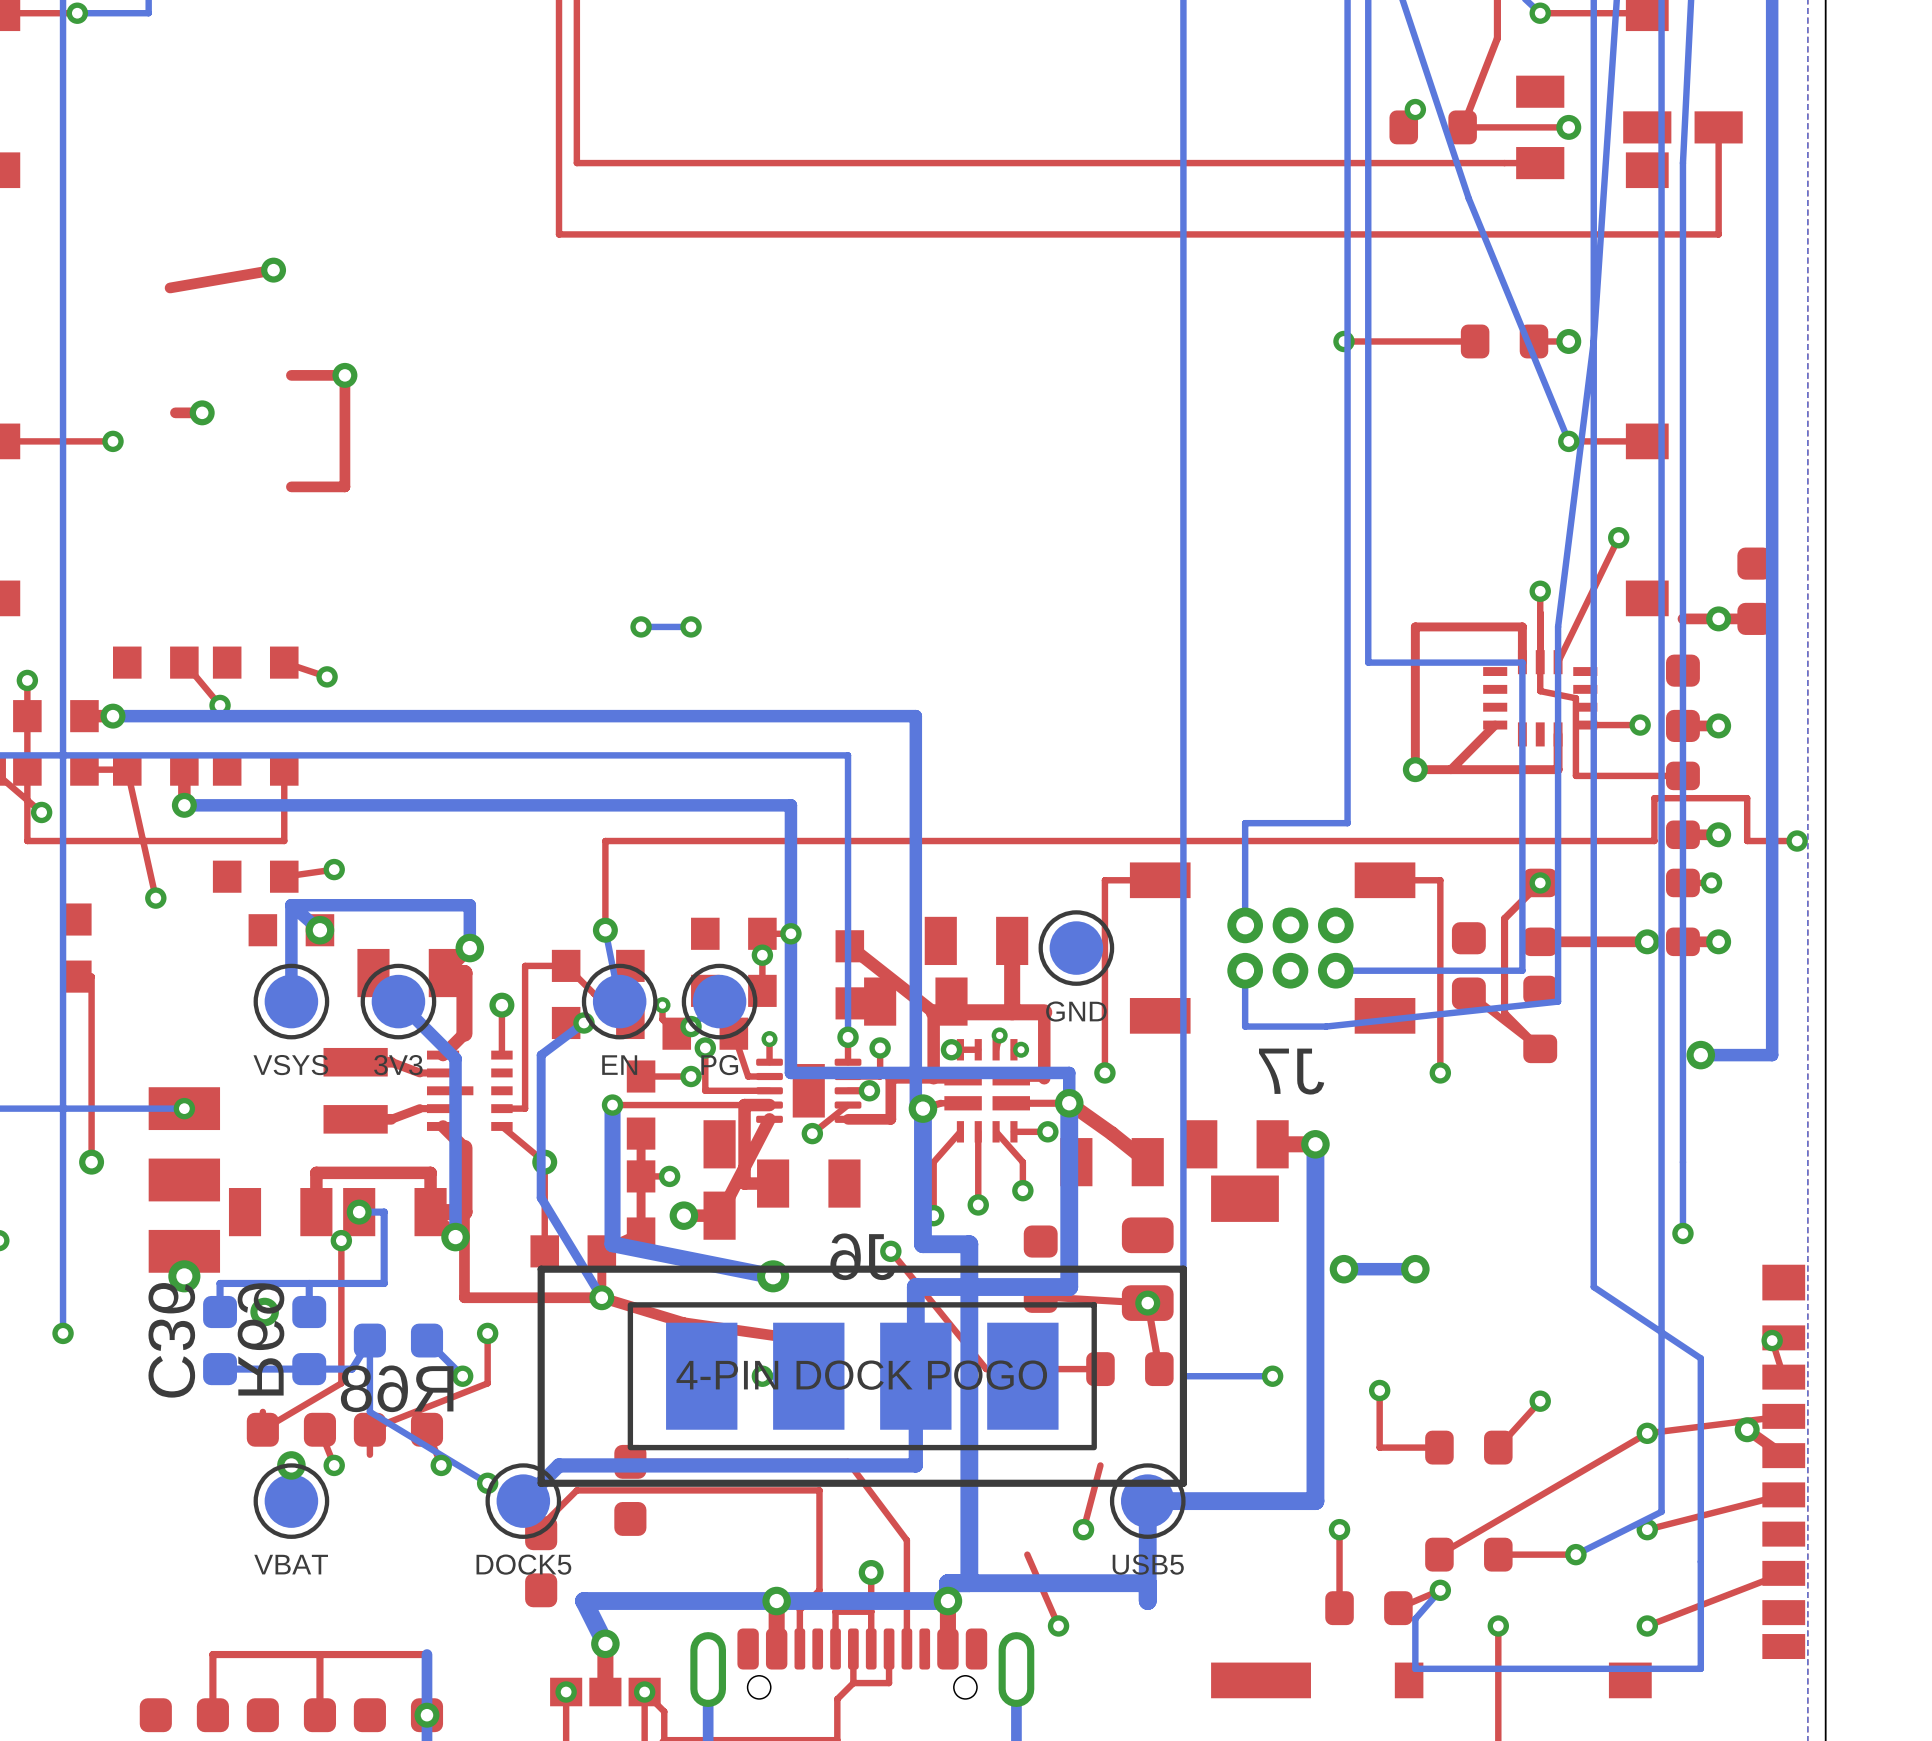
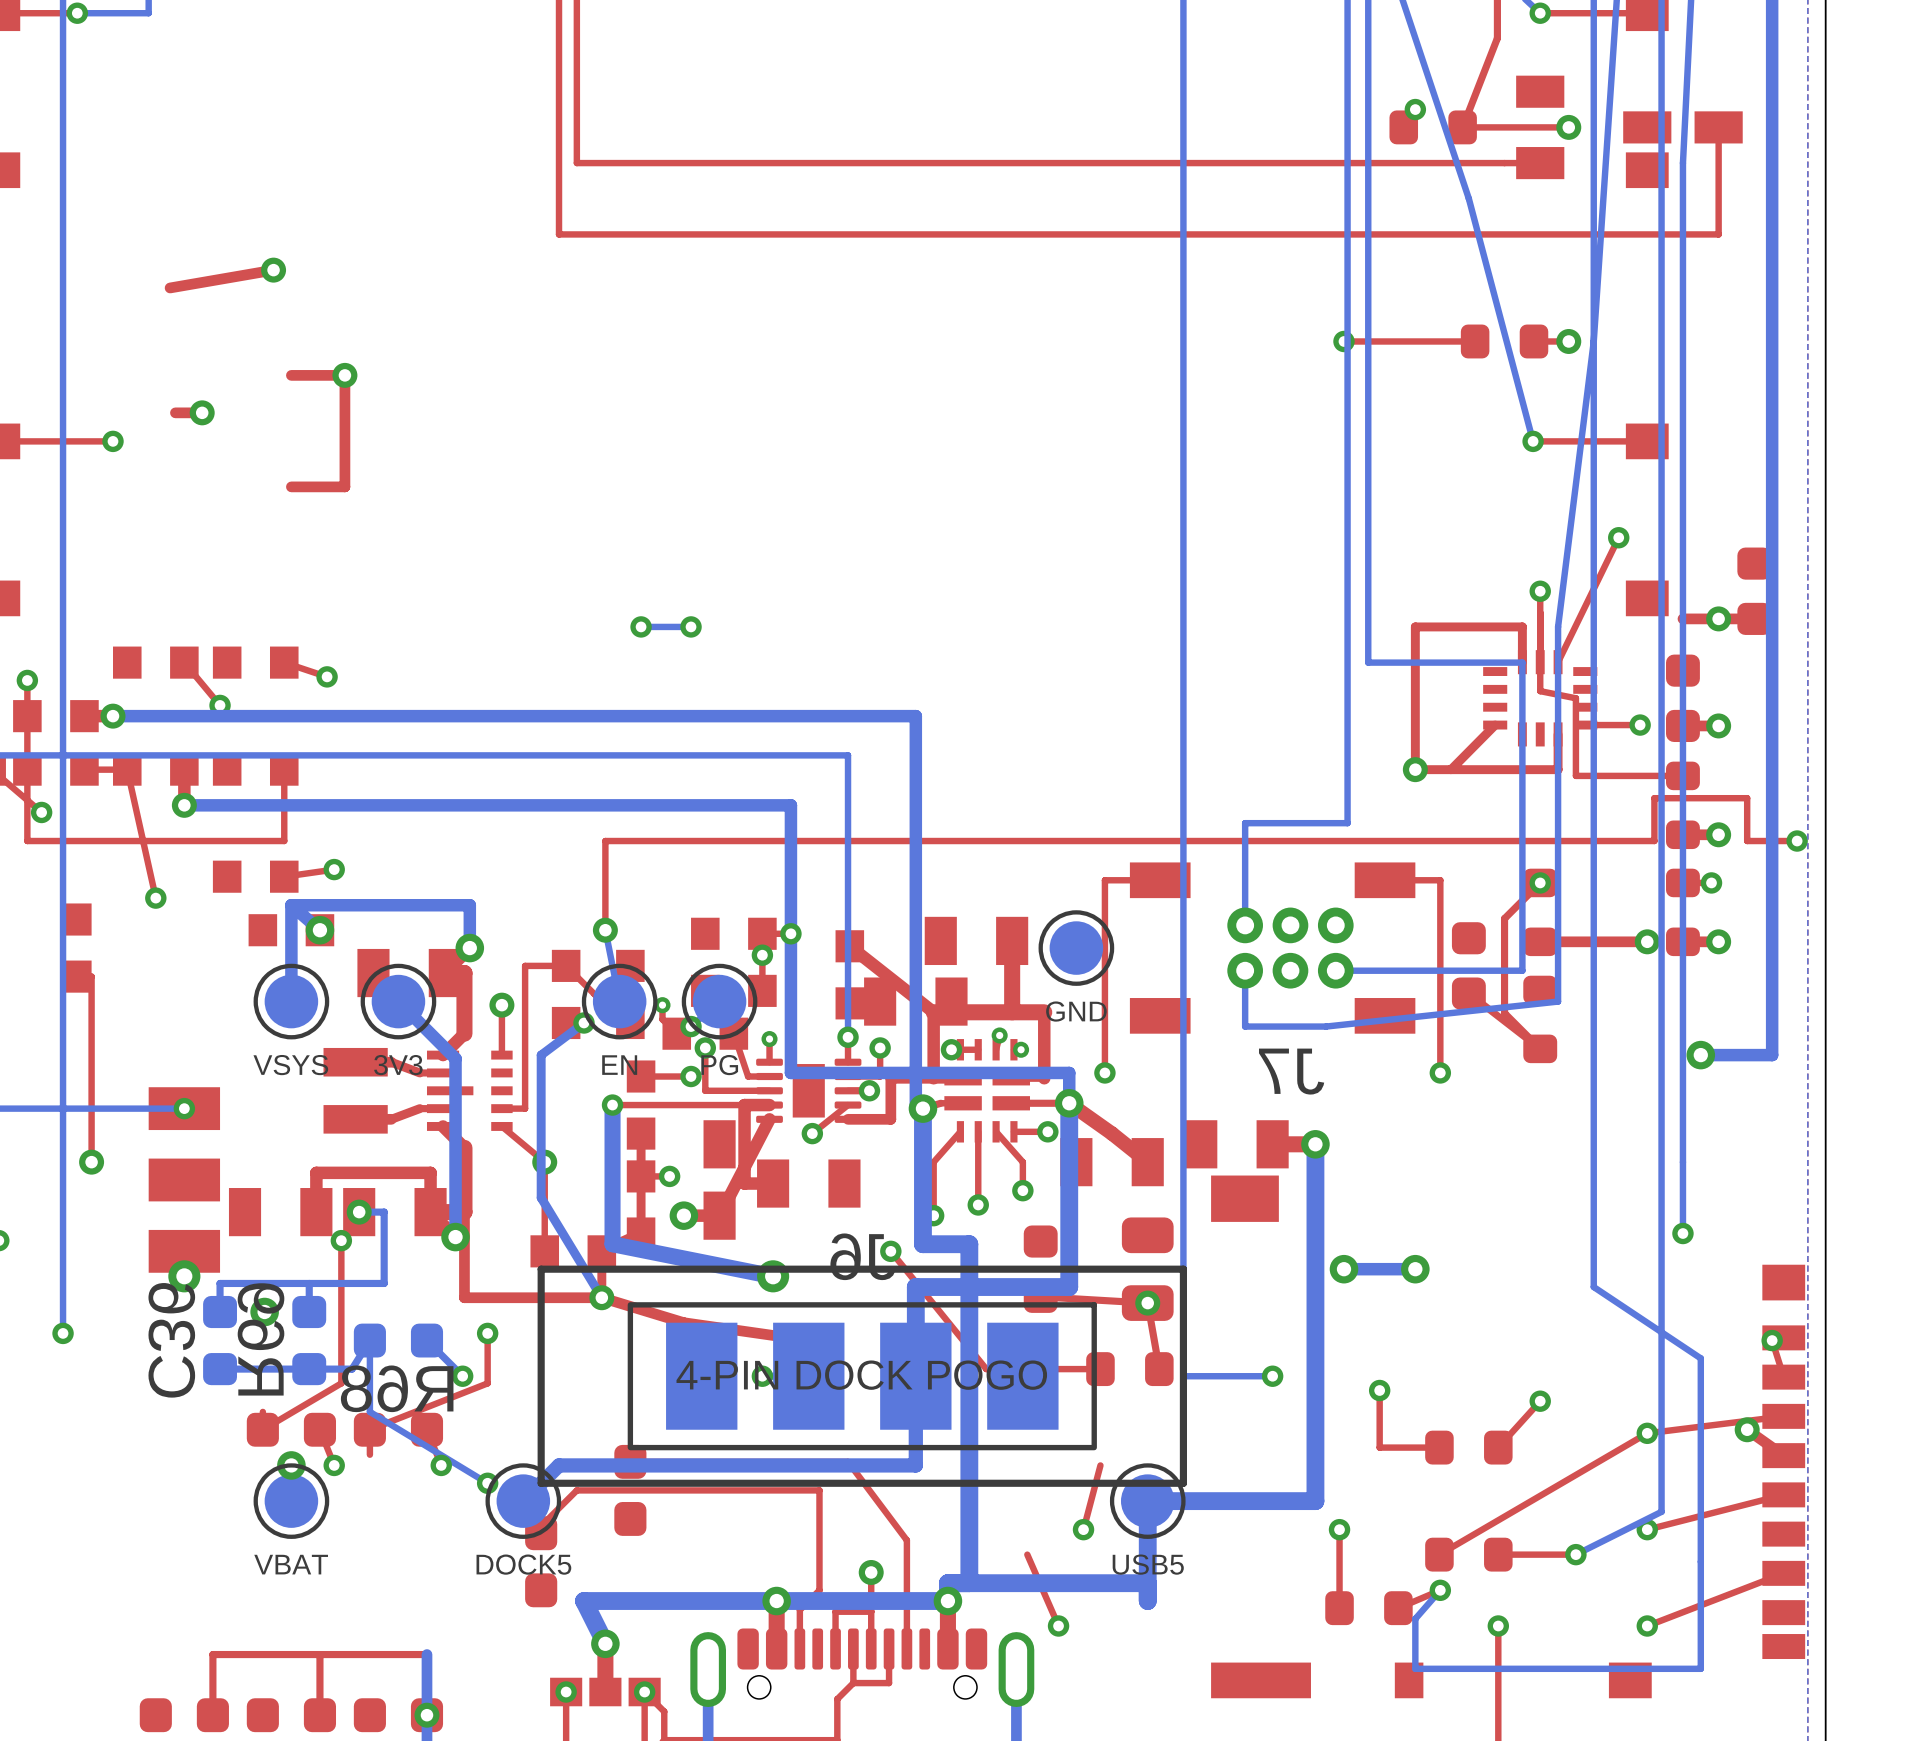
bottom track: (1468, 198) (1568, 441) -> (1468, 198) (1533, 441)
top track: none -> (1568, 441) (1533, 441)
via position: (1568, 441) -> (1533, 441)

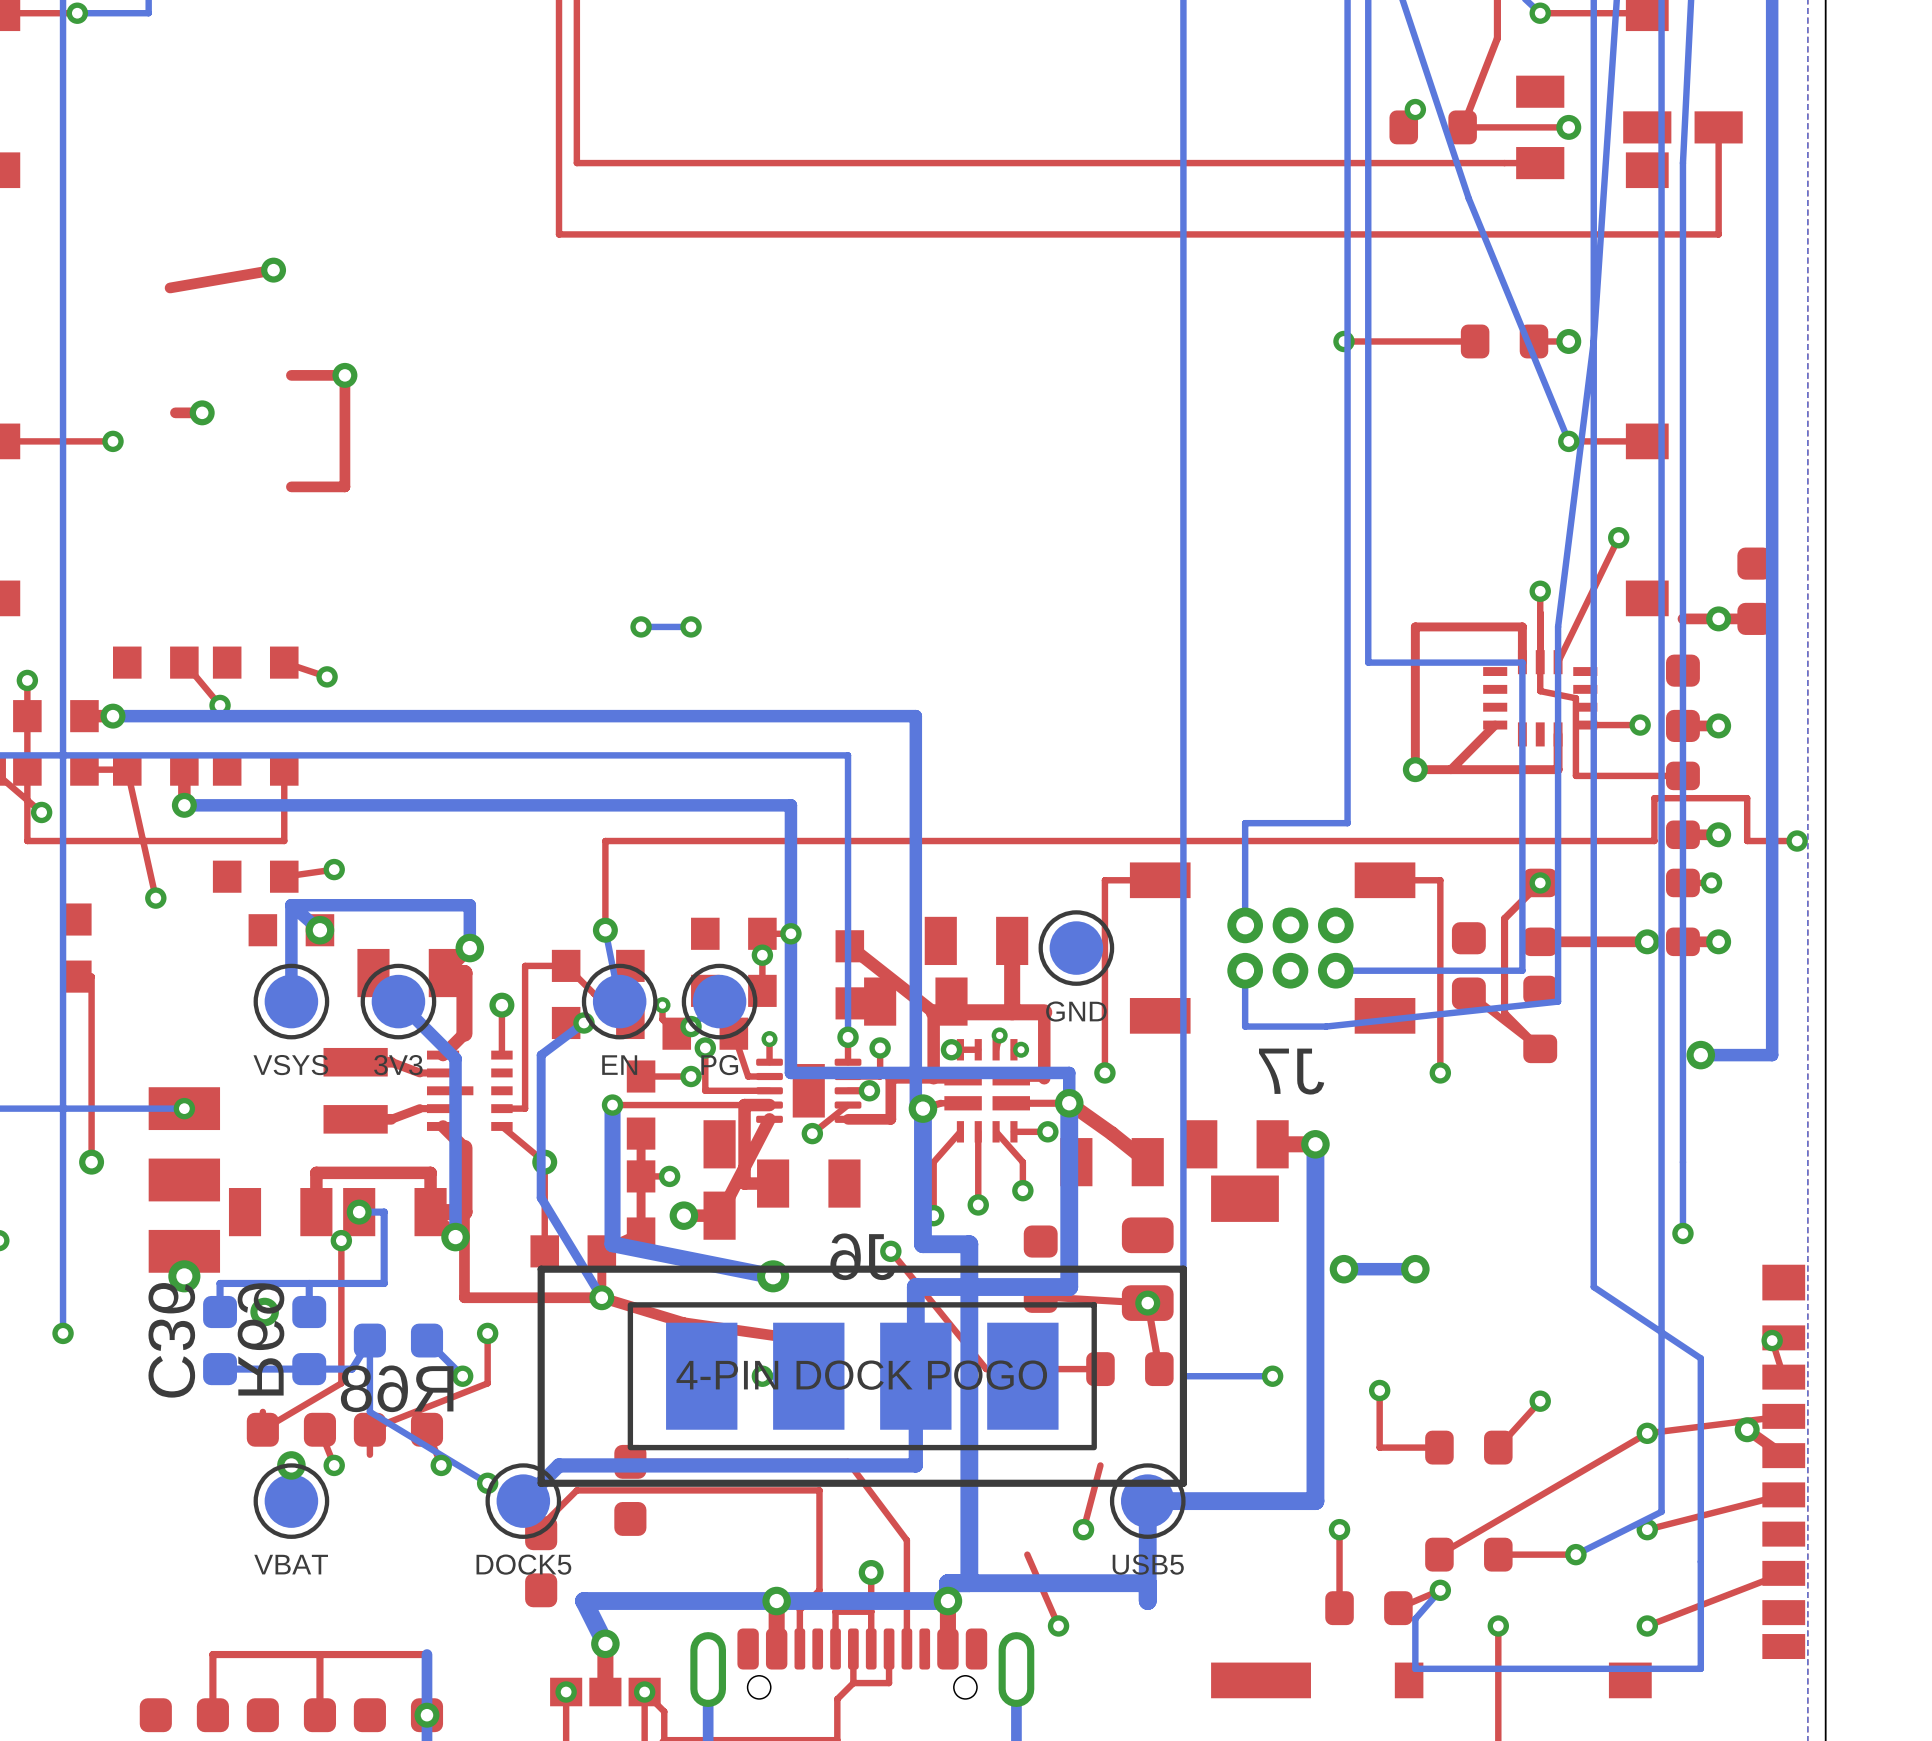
bottom track: (1468, 198) (1533, 441) -> (1468, 198) (1568, 441)
via position: (1533, 441) -> (1568, 441)
top track: (1568, 441) (1533, 441) -> none

